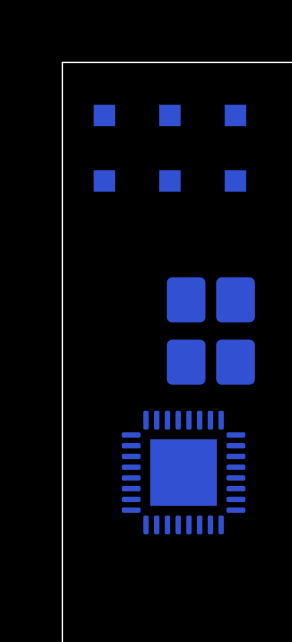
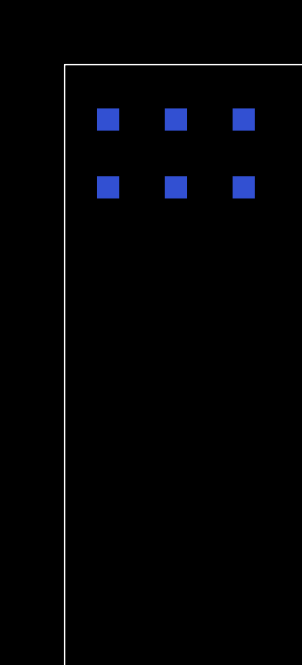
part: (210, 331) -> none
part: (183, 472) -> none

